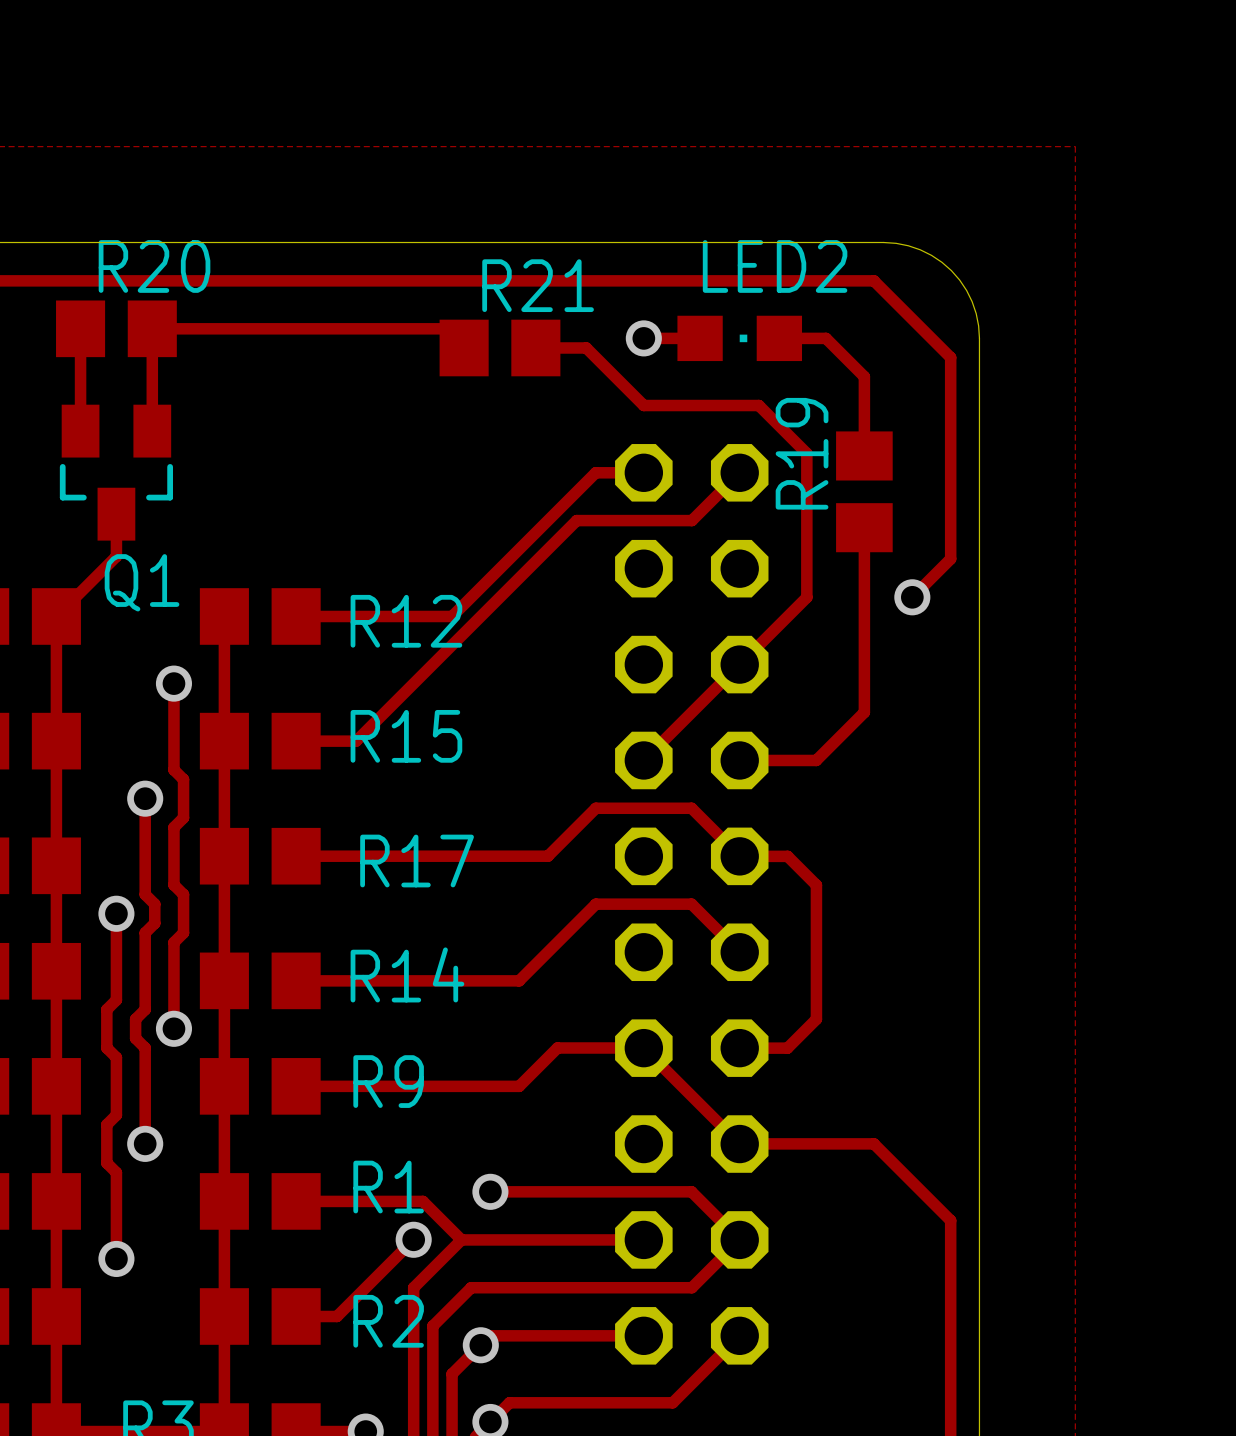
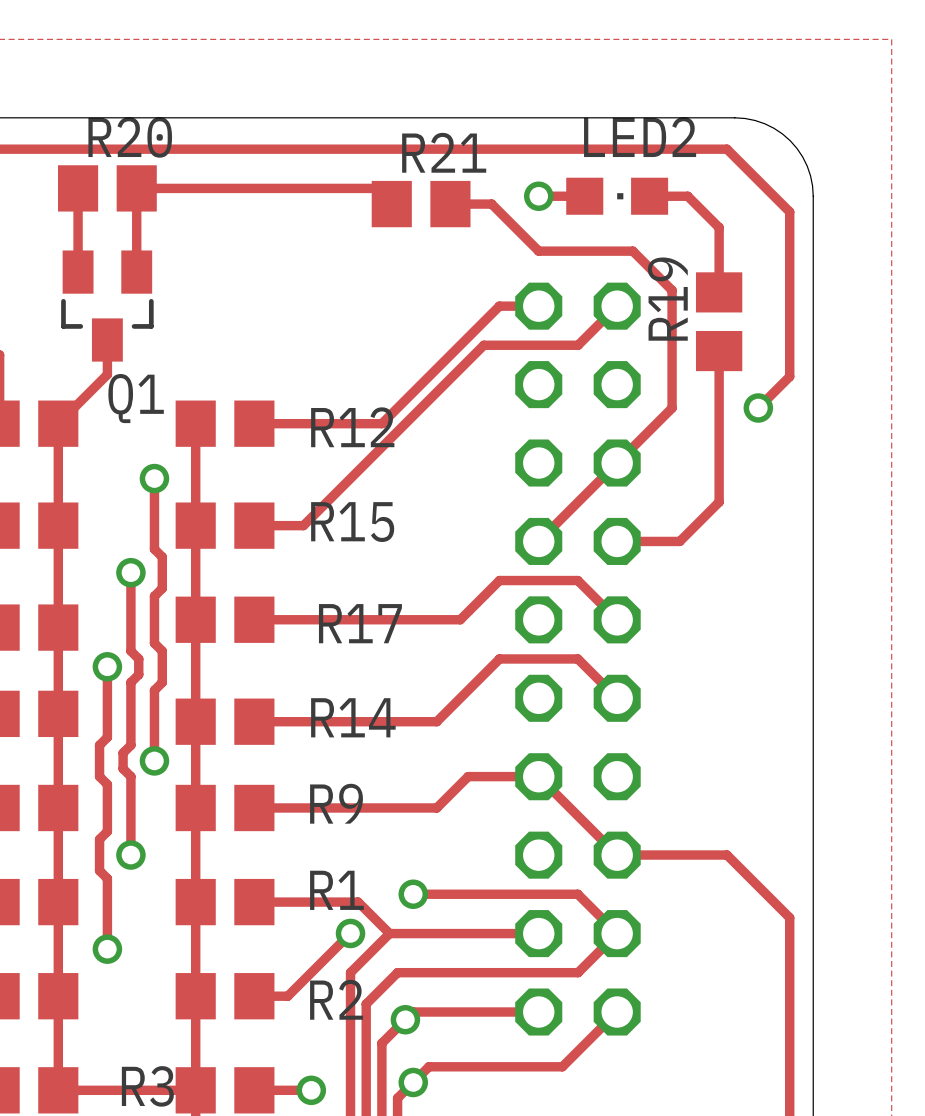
track: (739, 856) (787, 856) (816, 885) (816, 1019) (787, 1048) (739, 1048) -> none

